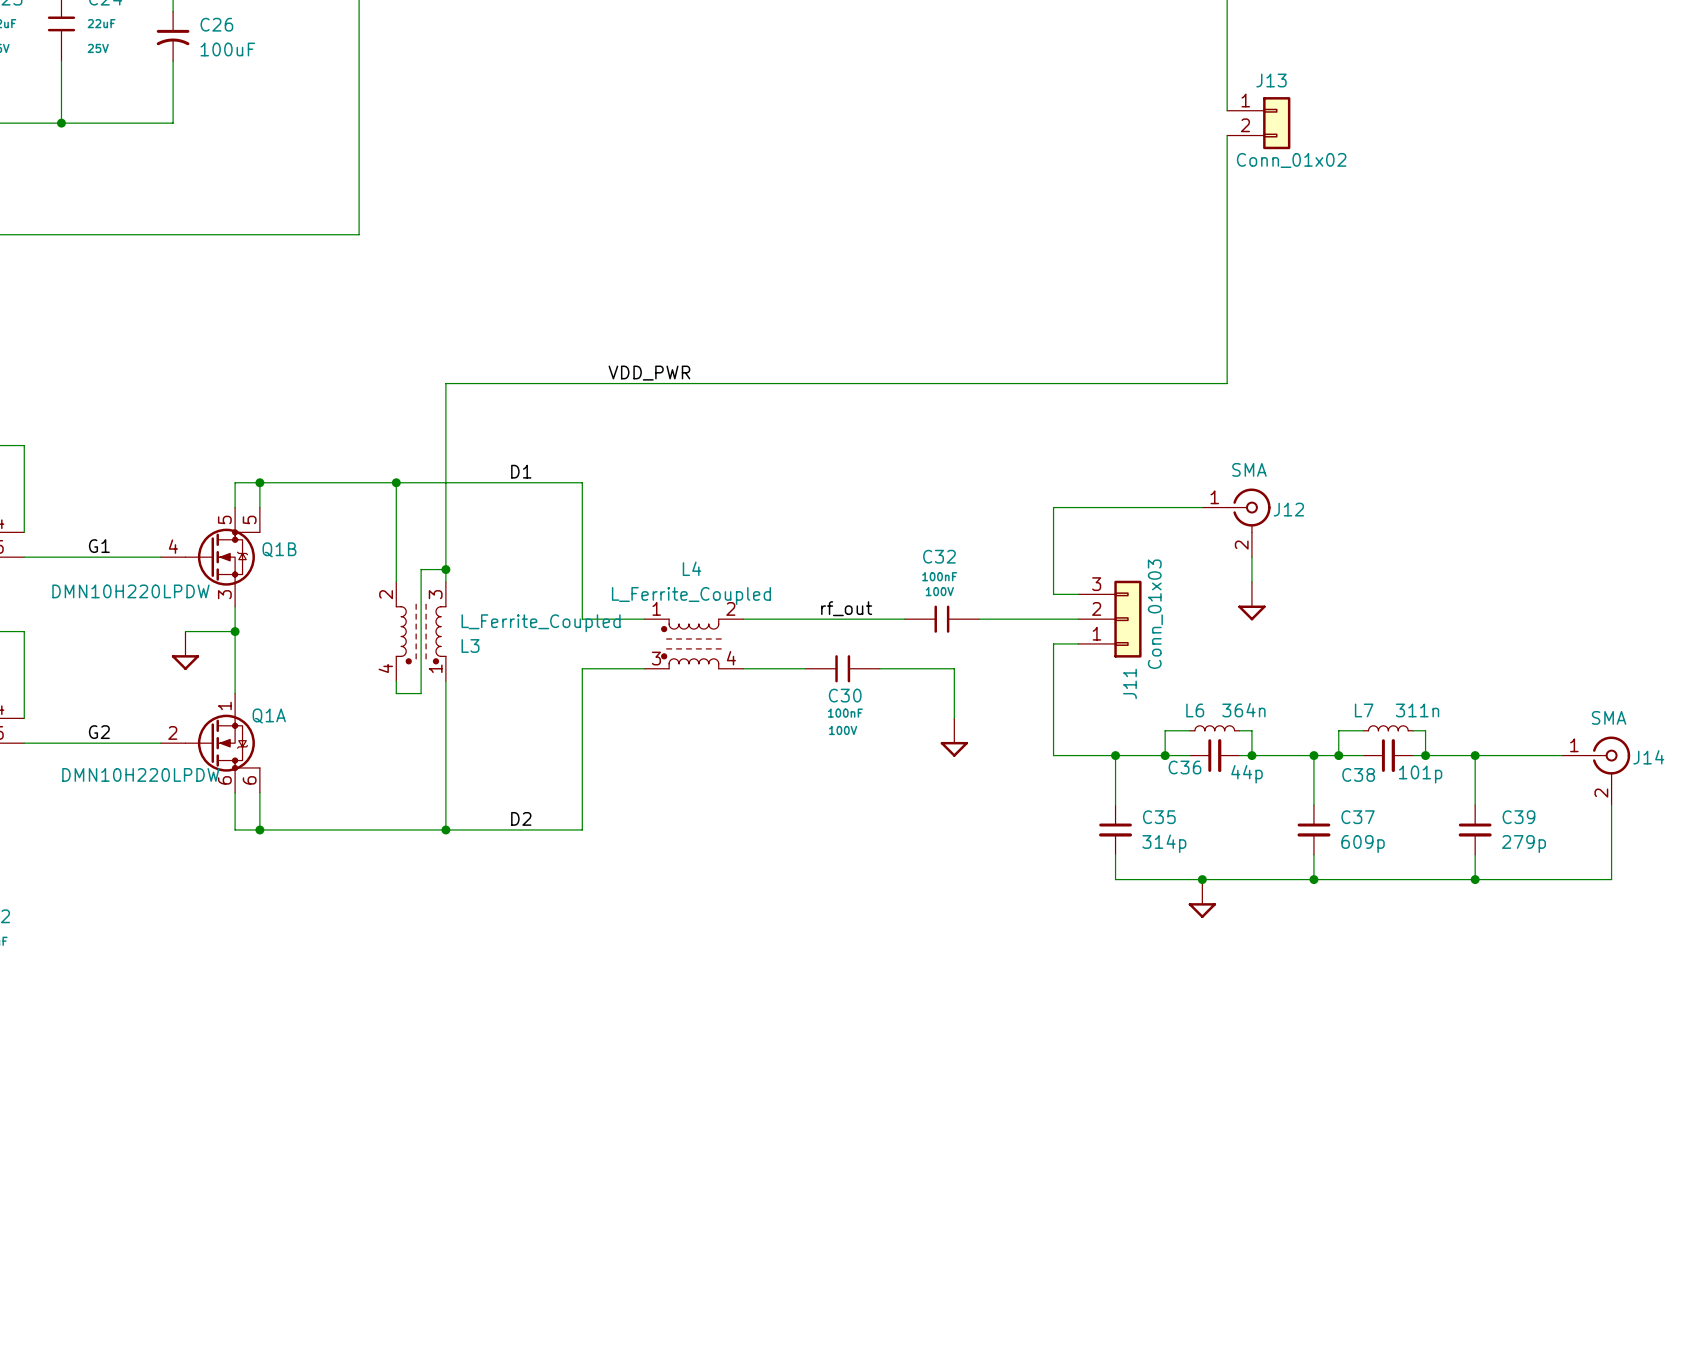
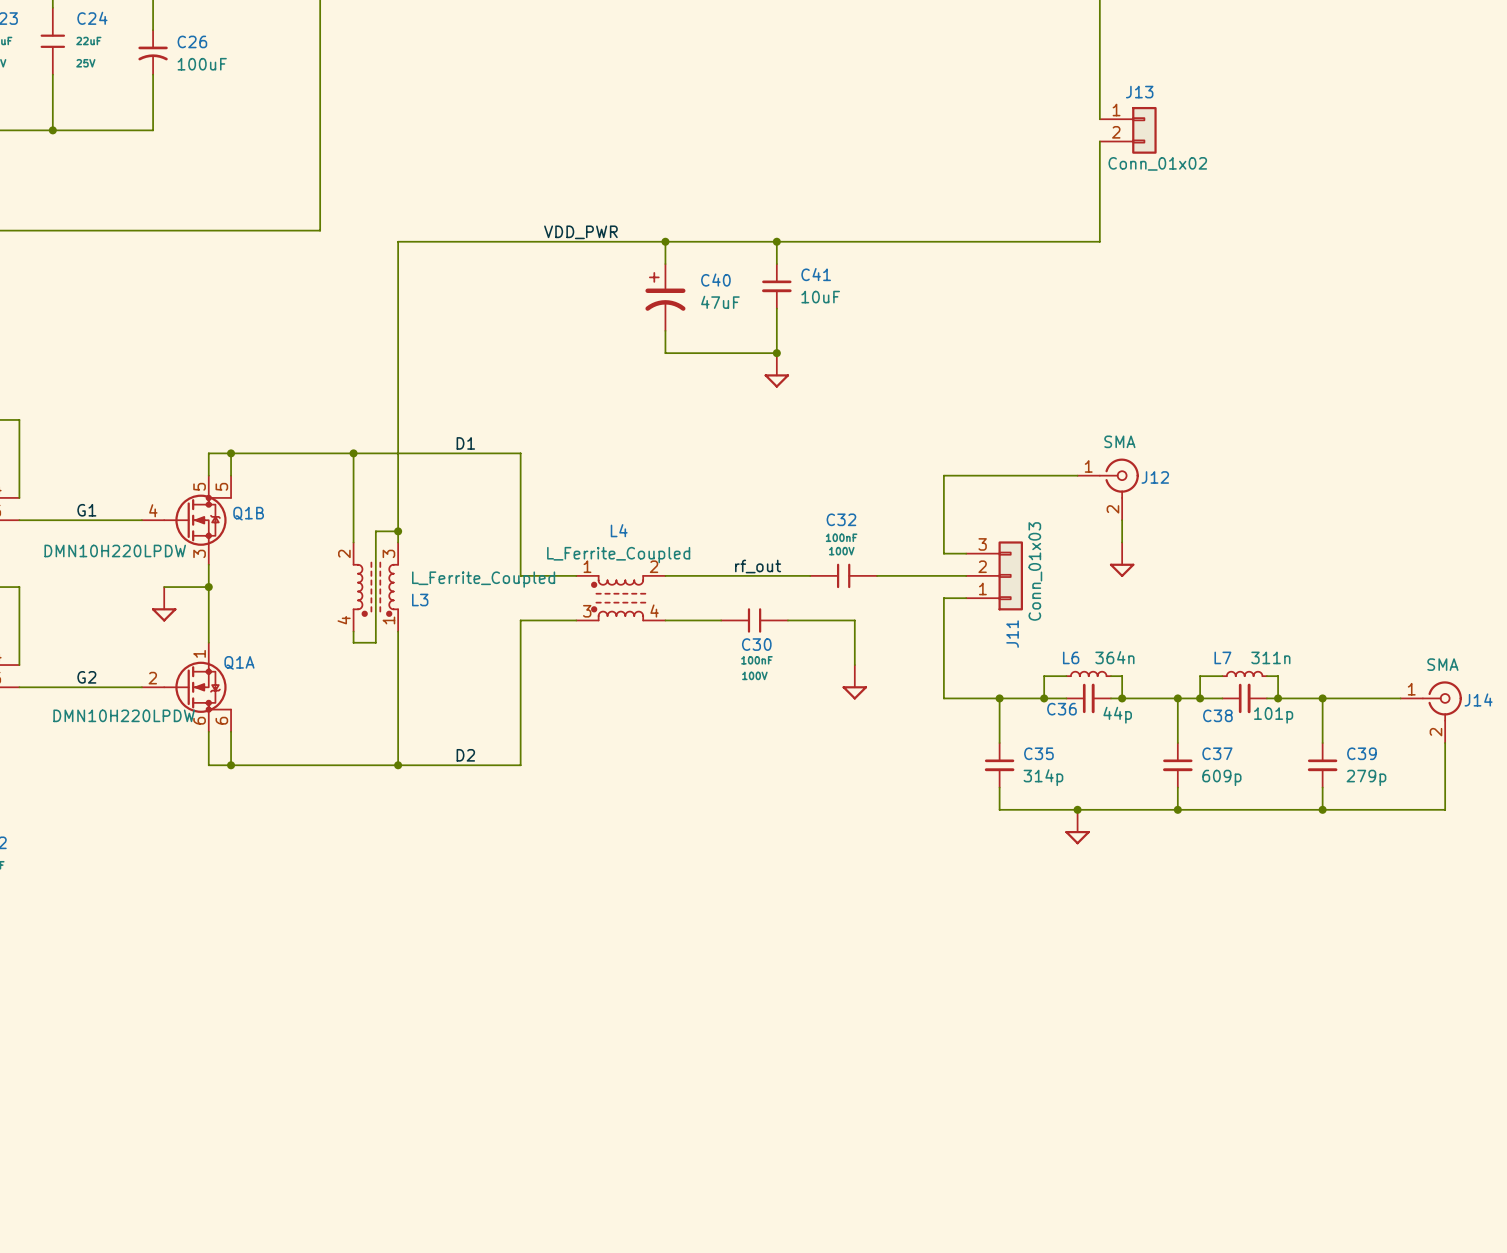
wire: none -> (665, 241) (665, 264)
junction: none -> (665, 241)
wire: none -> (776, 241) (776, 264)
junction: none -> (776, 241)
wire: (1227, 247) (1227, 383) (445, 383) -> (1099, 241) (398, 241) (398, 364)
C41: none -> 10uF (776, 286)
C40: none -> 47uF (665, 297)
wire: none -> (776, 308) (776, 353) (665, 353) (665, 330)
junction: none -> (776, 353)
label position: VDD_PWR (649, 373) -> VDD_PWR (580, 232)
power symbol: none -> (776, 370)

